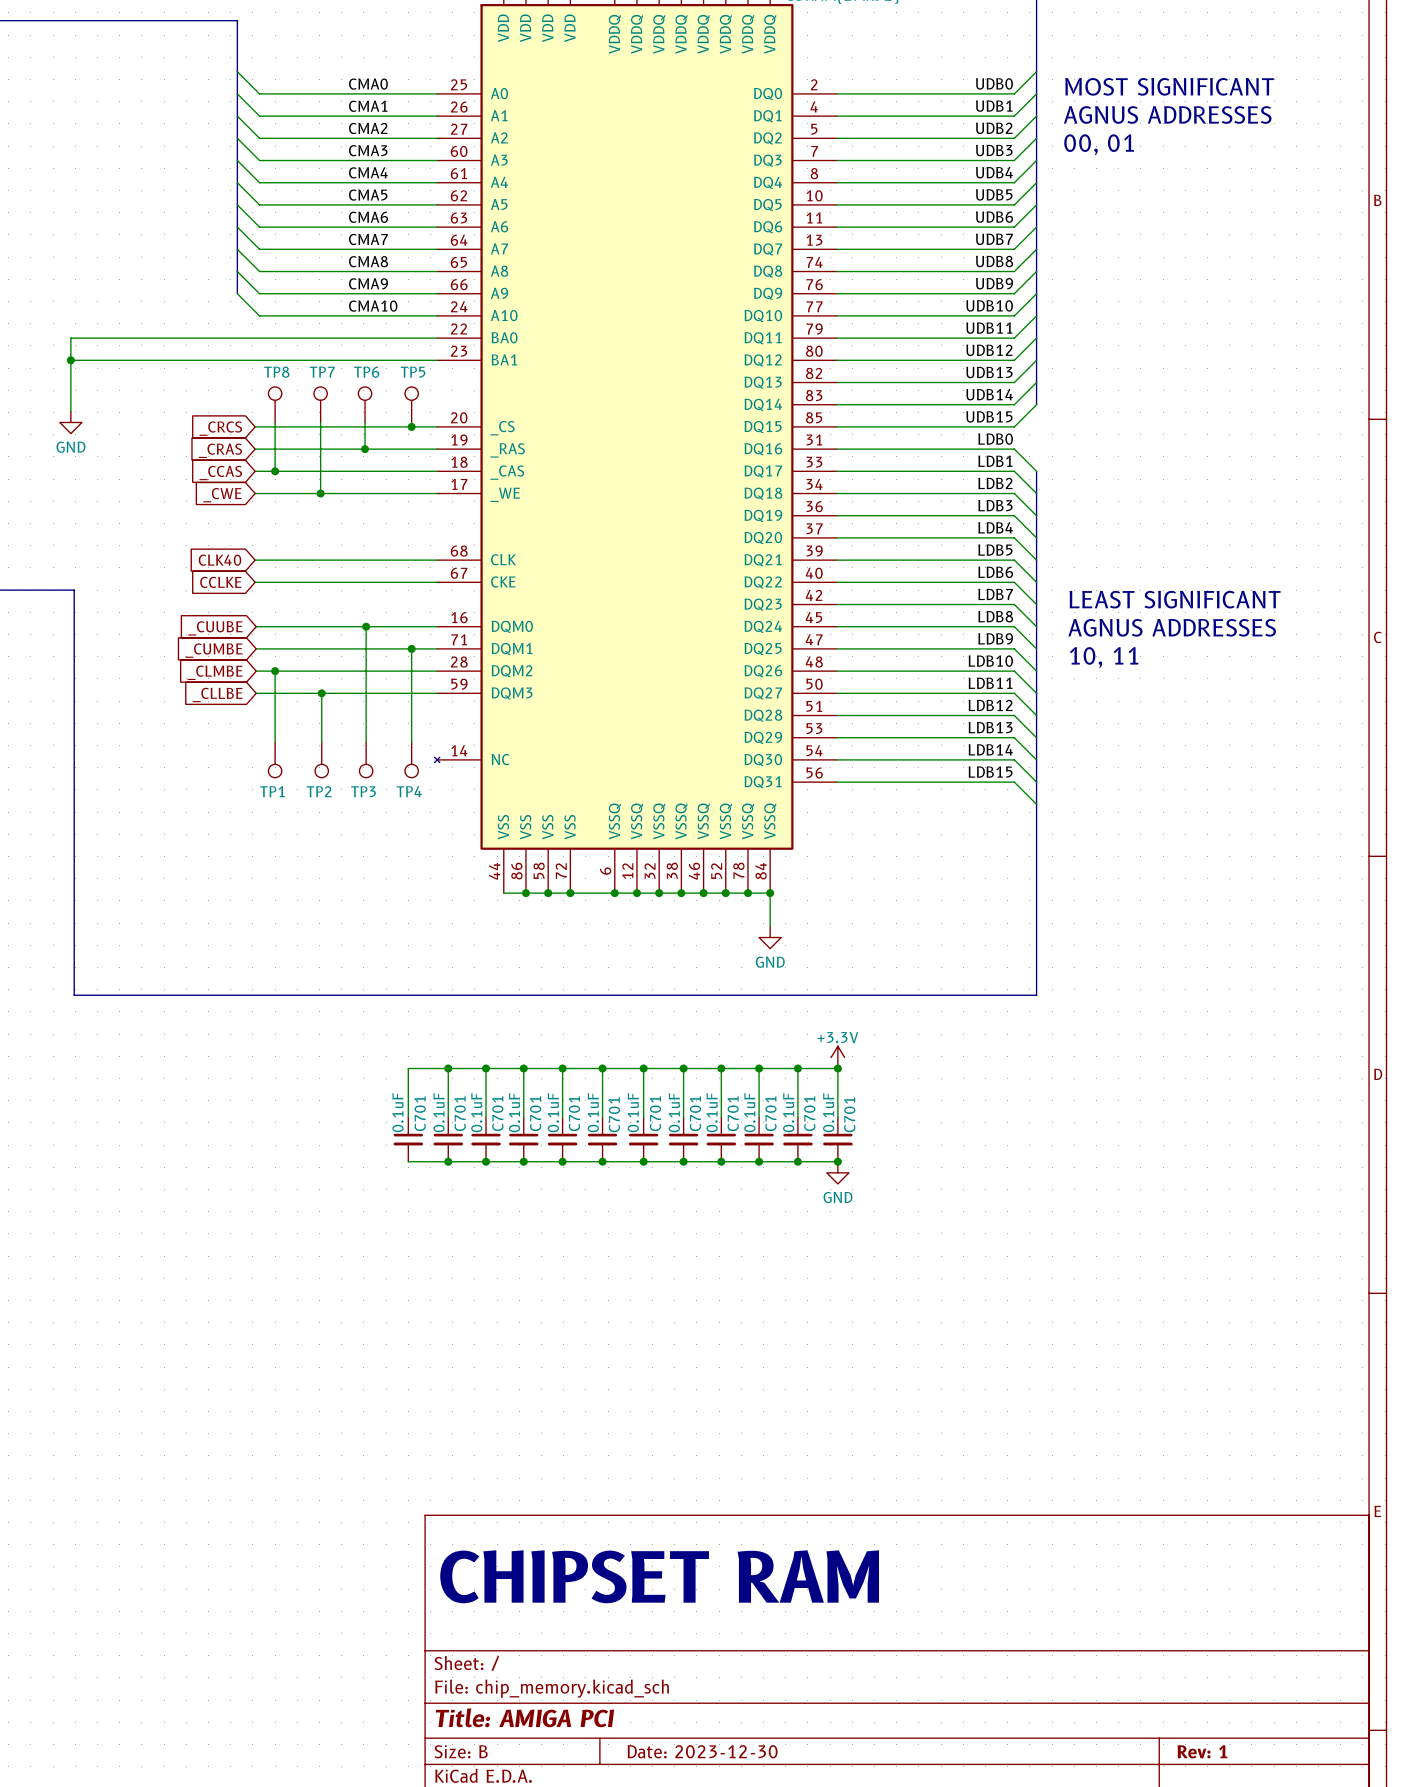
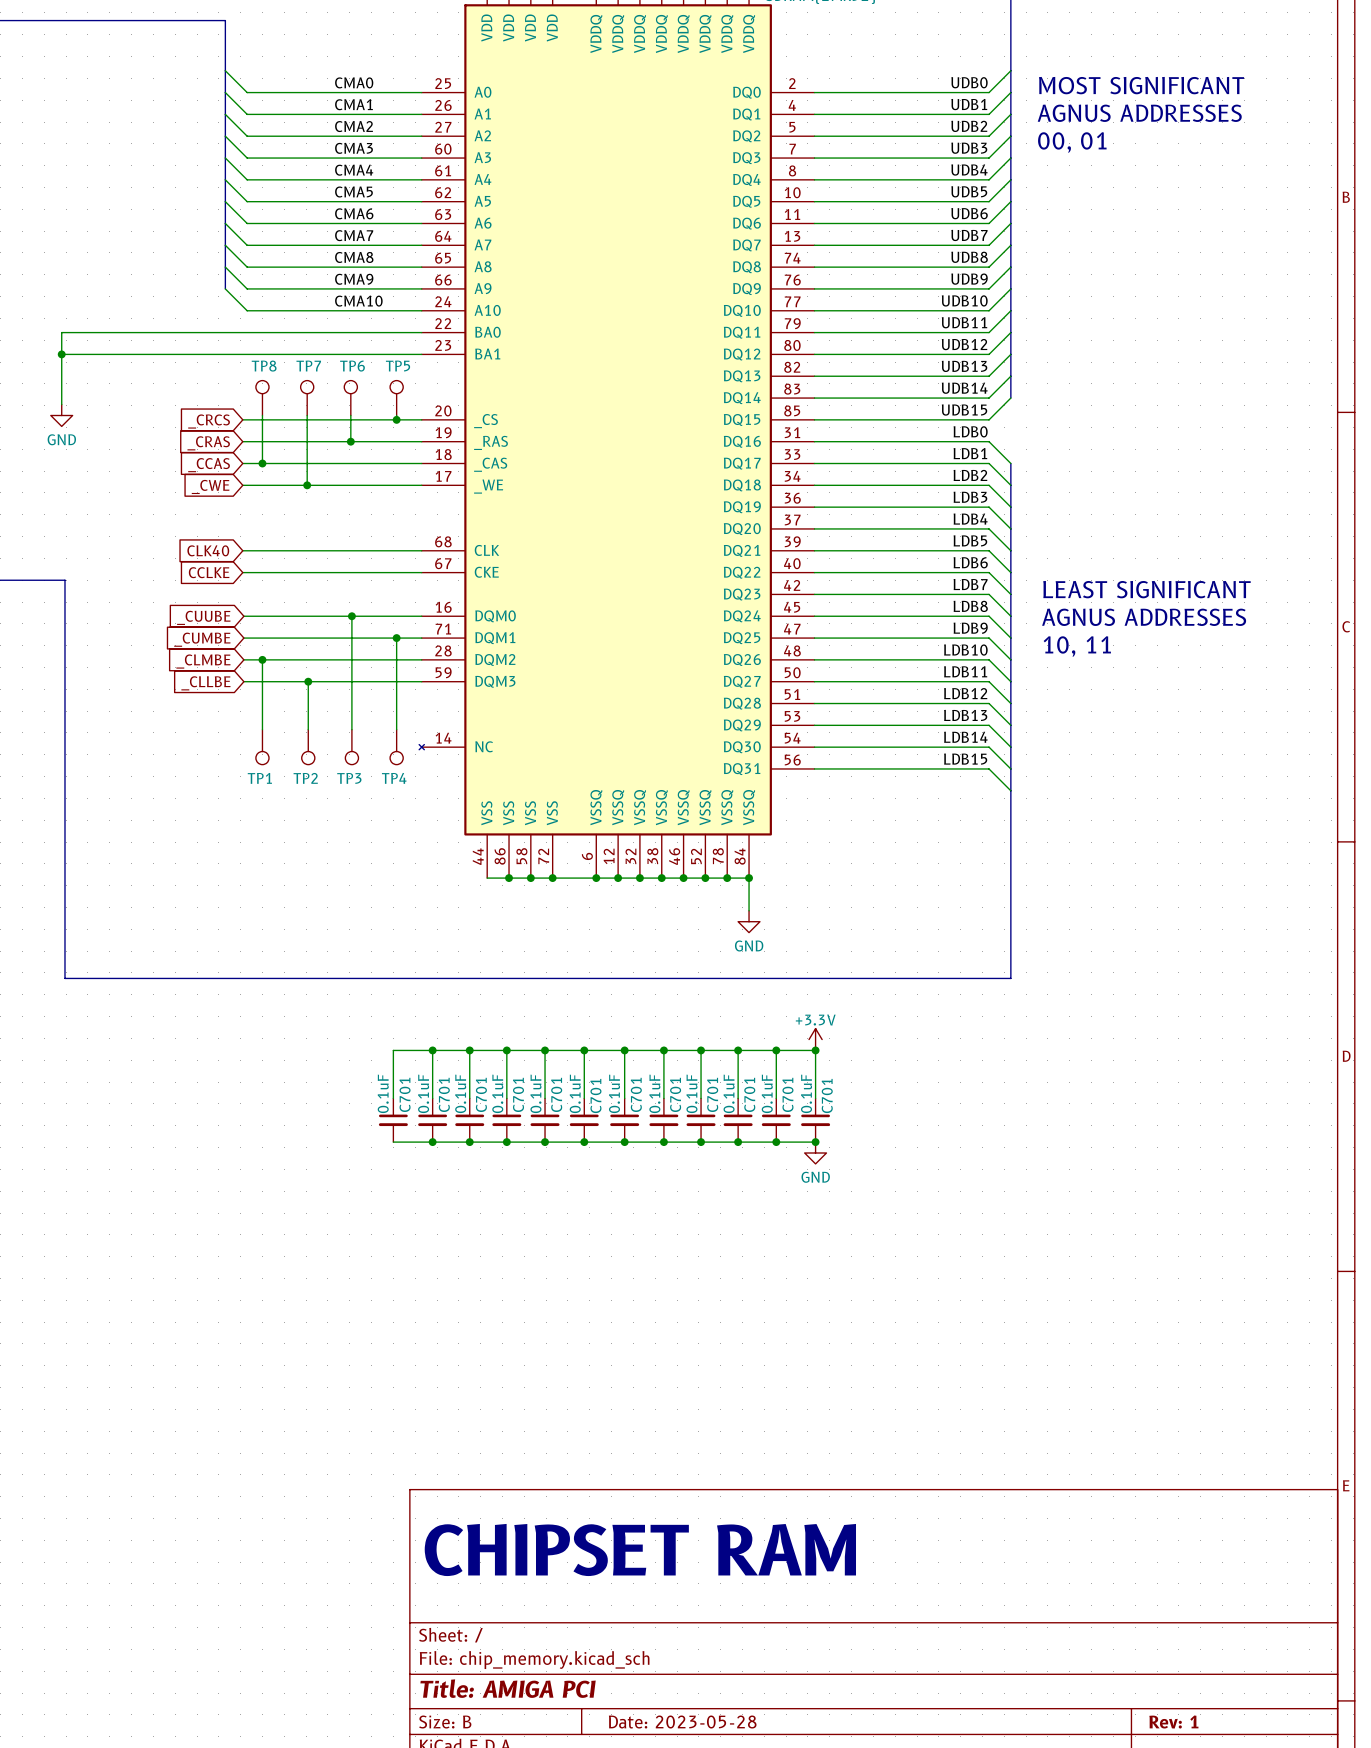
title block: Date: 2023-12-30 (702, 1751) -> Date: 2023-05-28 (682, 1722)

